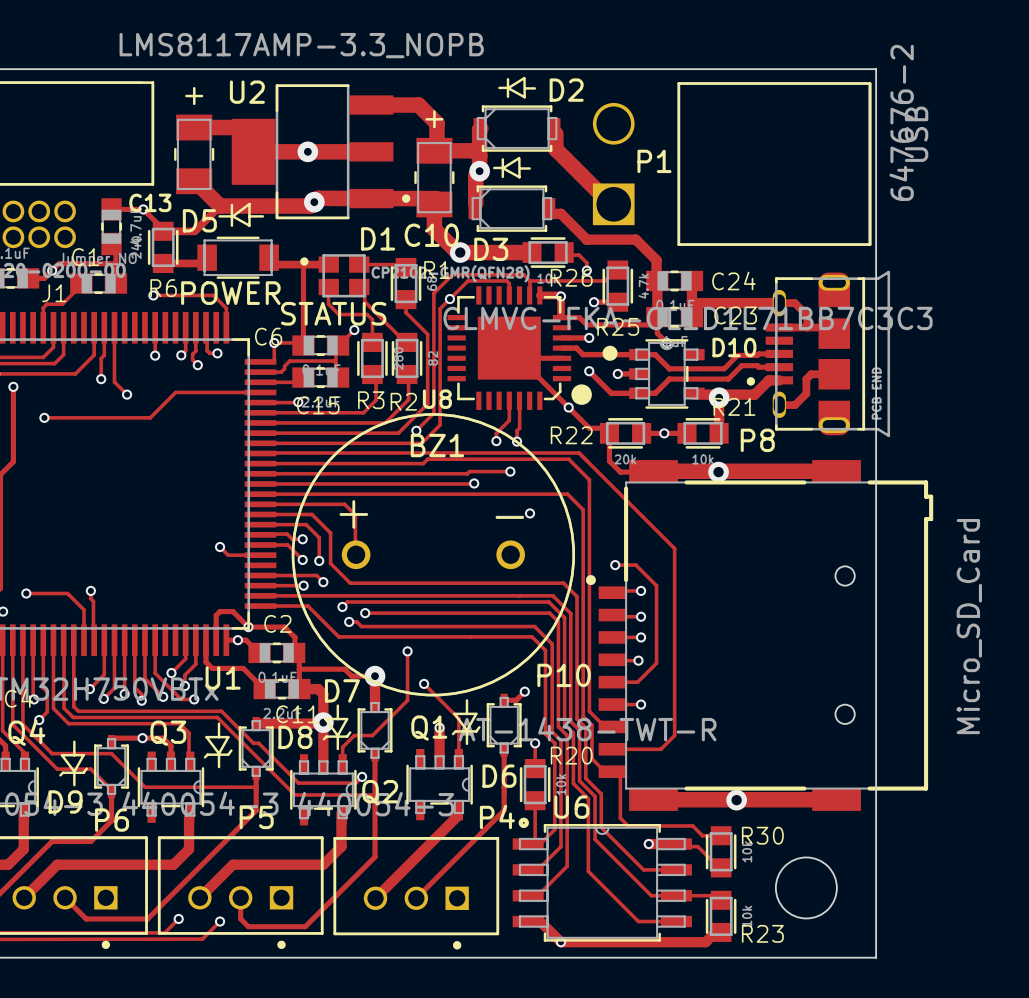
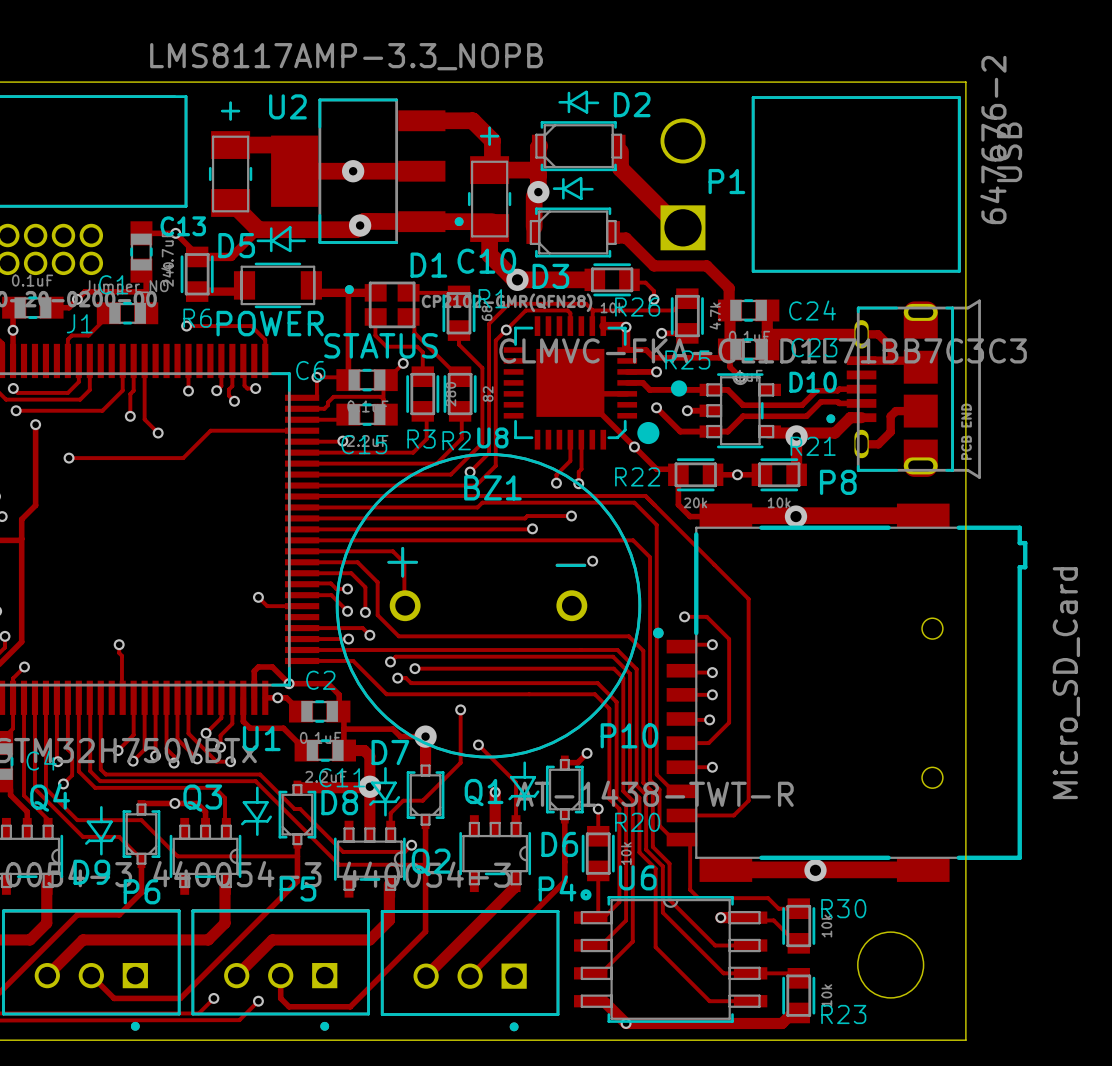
track: (26, 593) (67, 593) (83, 609) (83, 640) -> none
via: (26, 593) -> none

